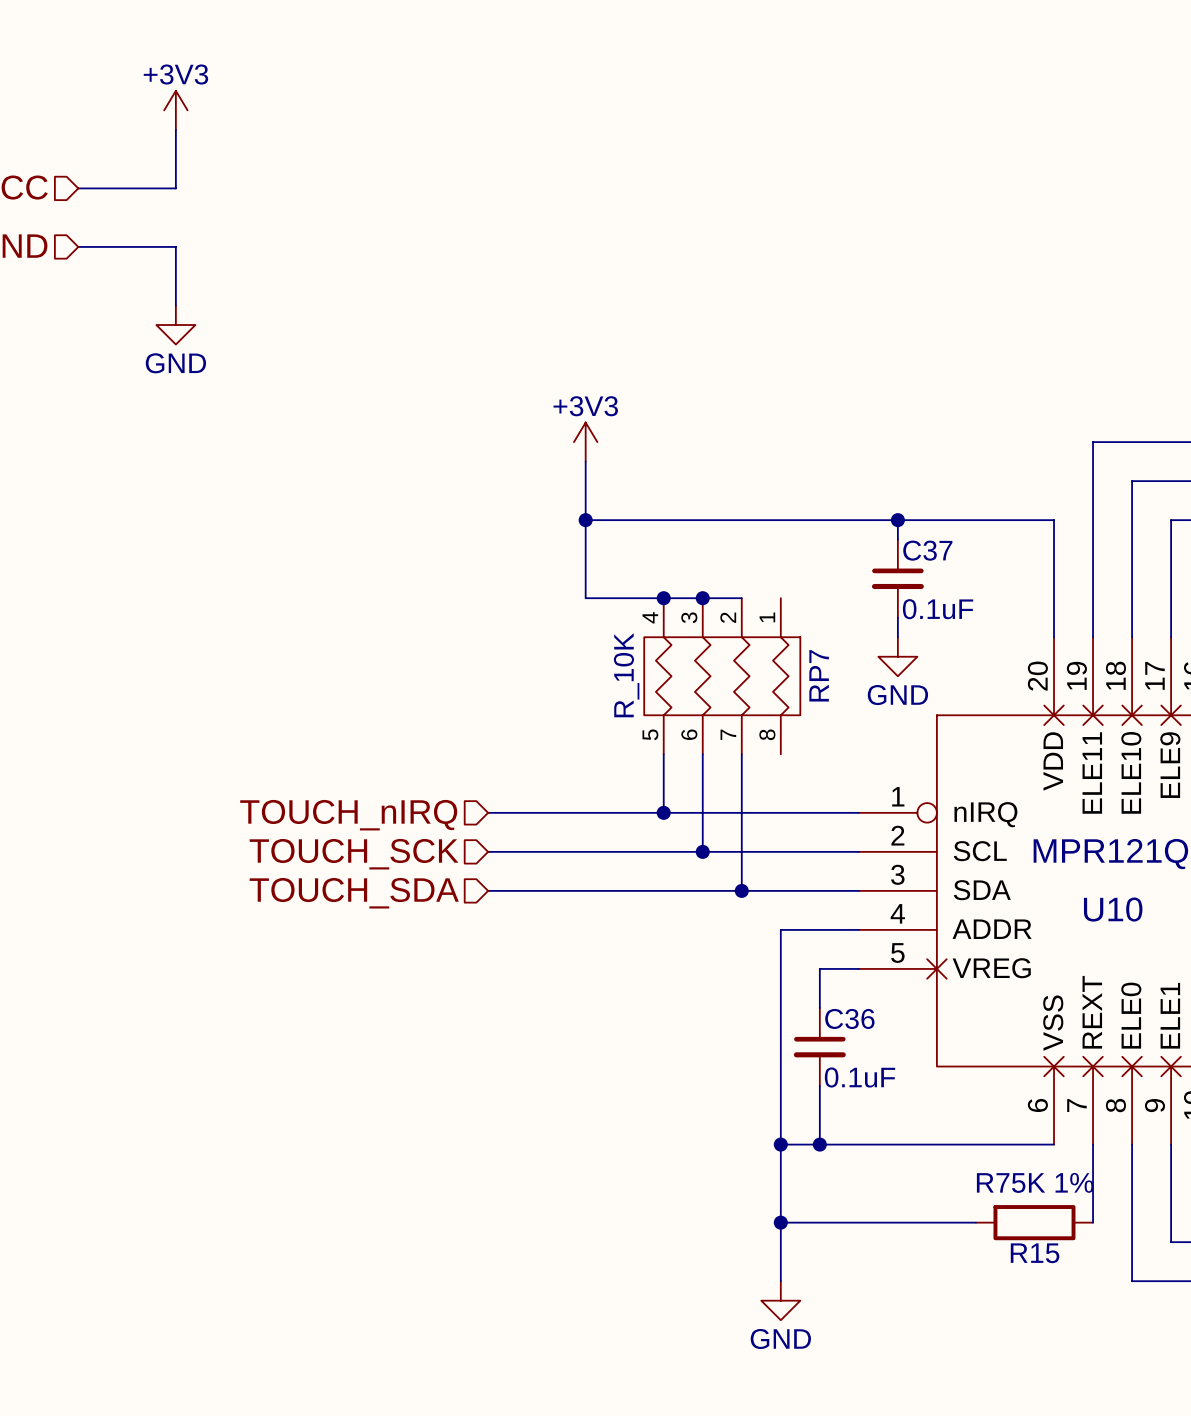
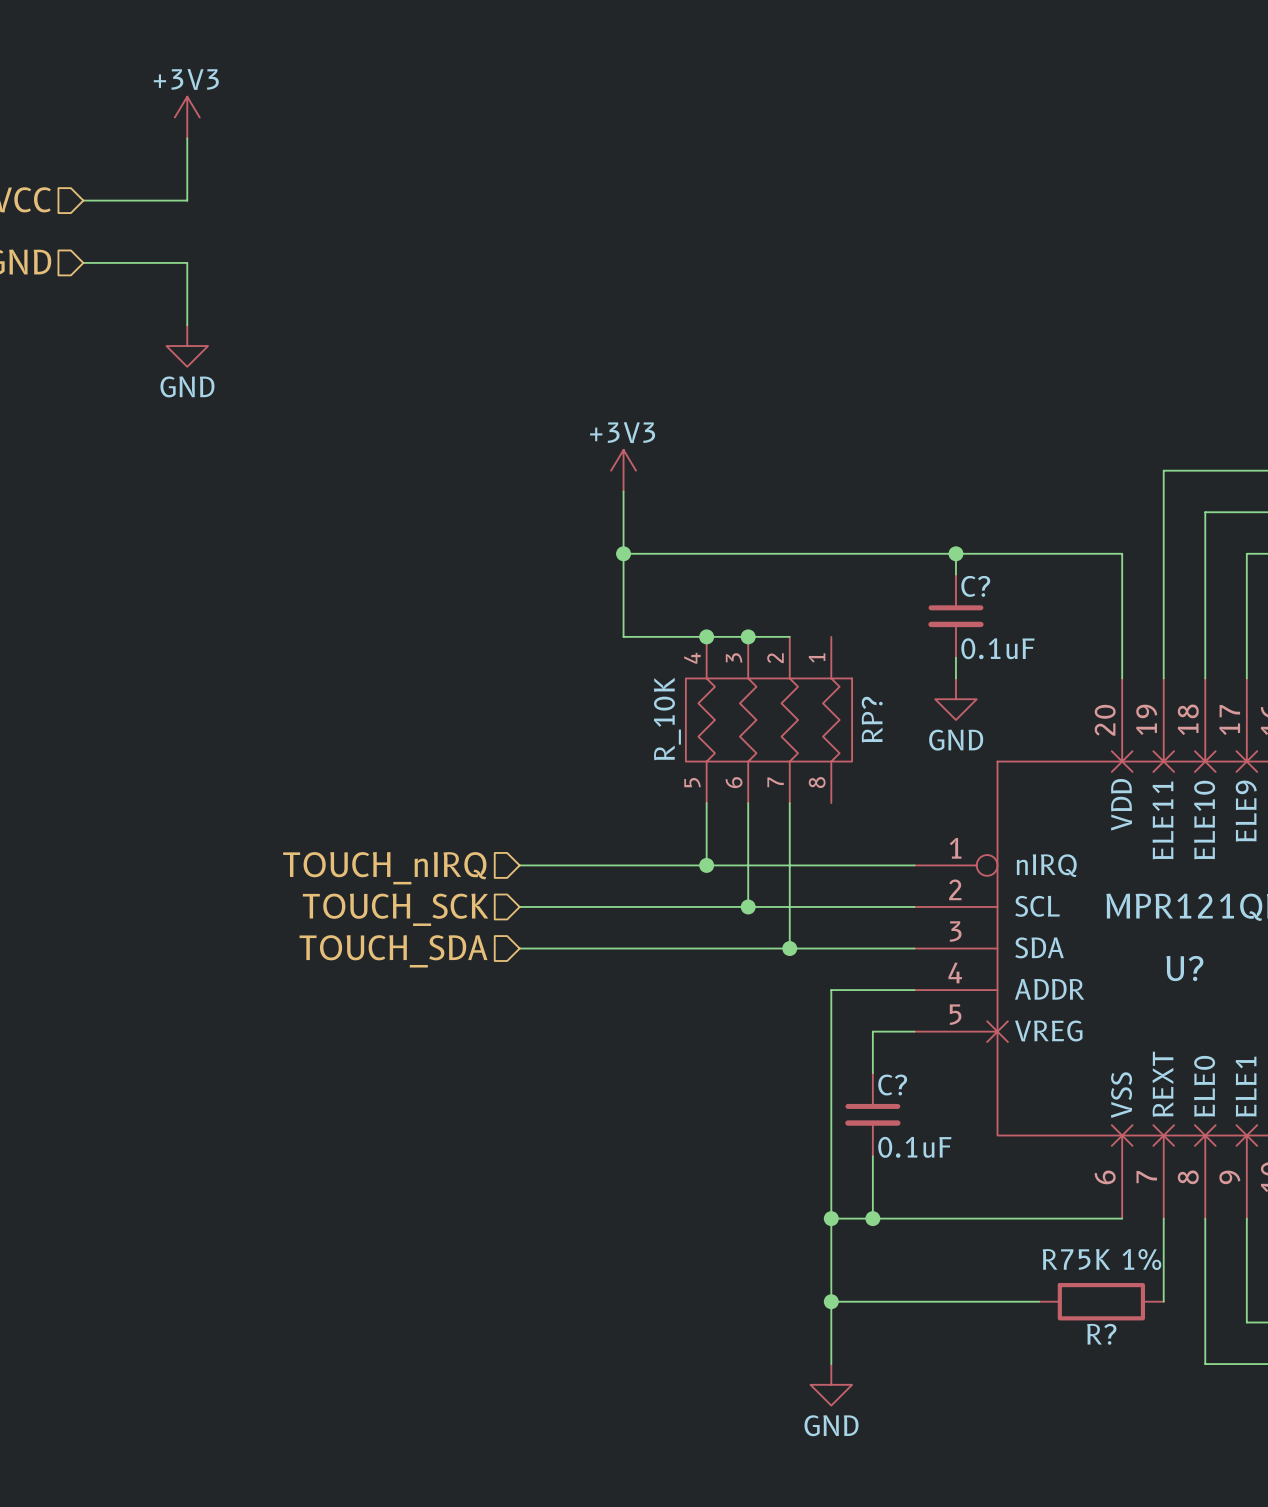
C37 name: C37 (927, 550) -> C? (975, 586)
RP7 name: RP7 (819, 675) -> RP? (872, 719)
U10 name: U10 (1113, 909) -> U? (1184, 968)
C36 name: C36 (849, 1018) -> C? (892, 1085)
R15 name: R15 (1035, 1253) -> R? (1101, 1334)

